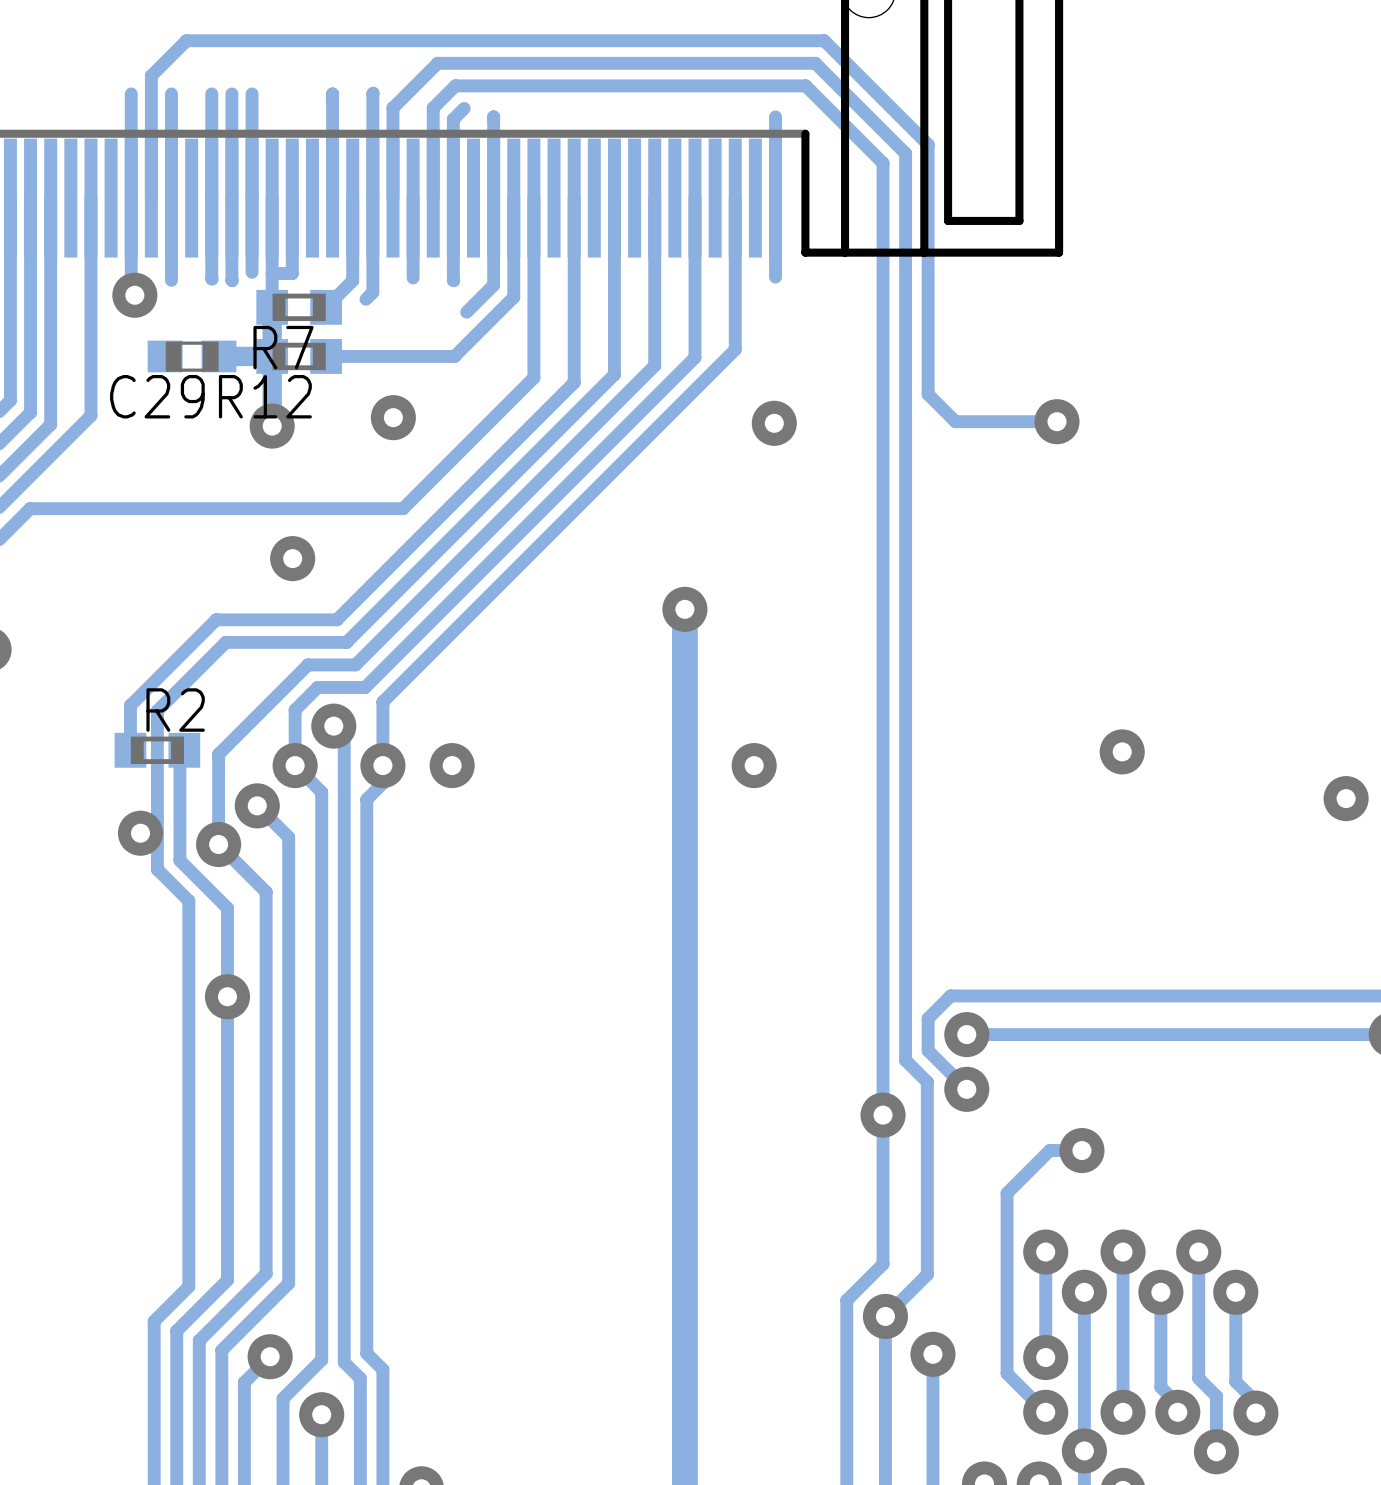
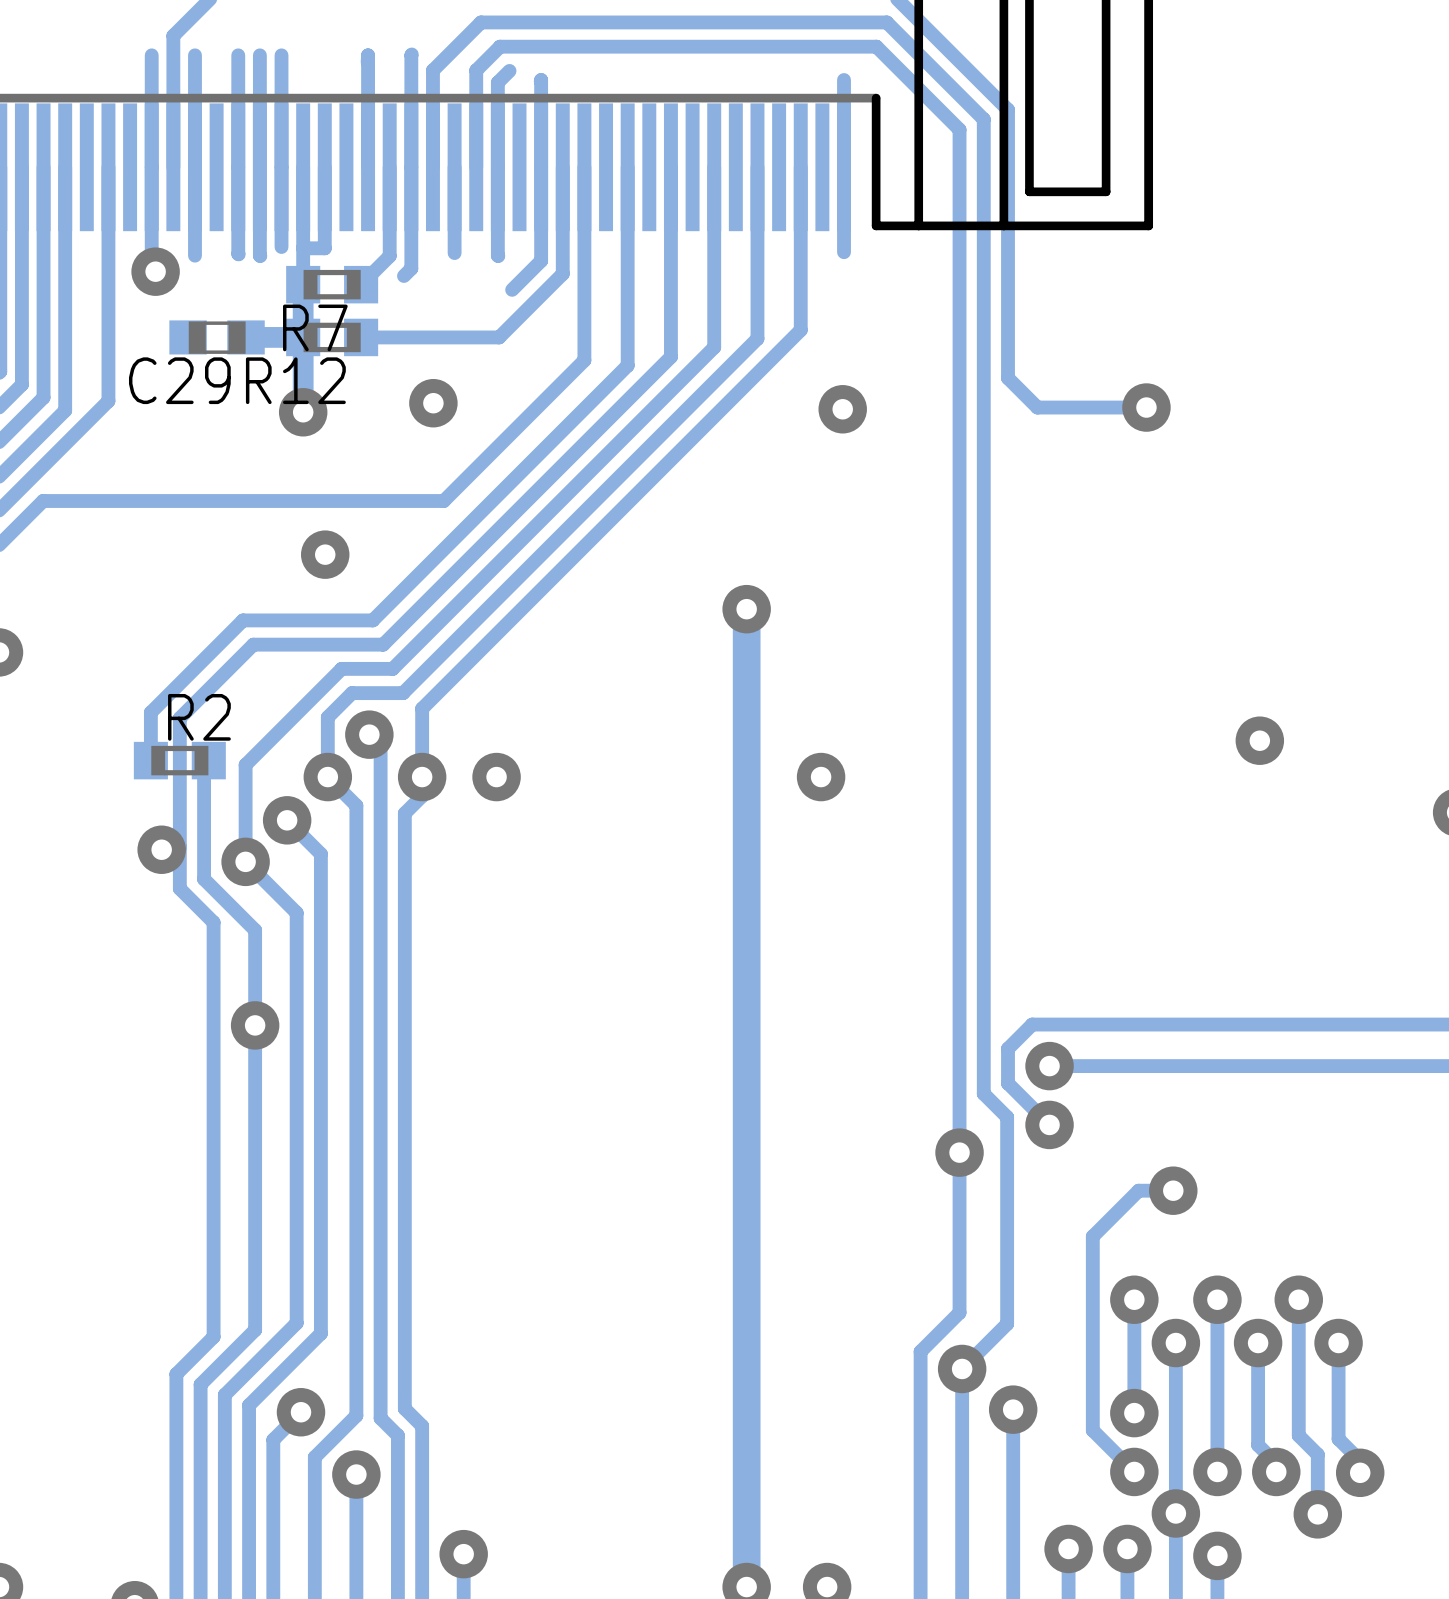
via position: (1122, 751) -> (1259, 740)

